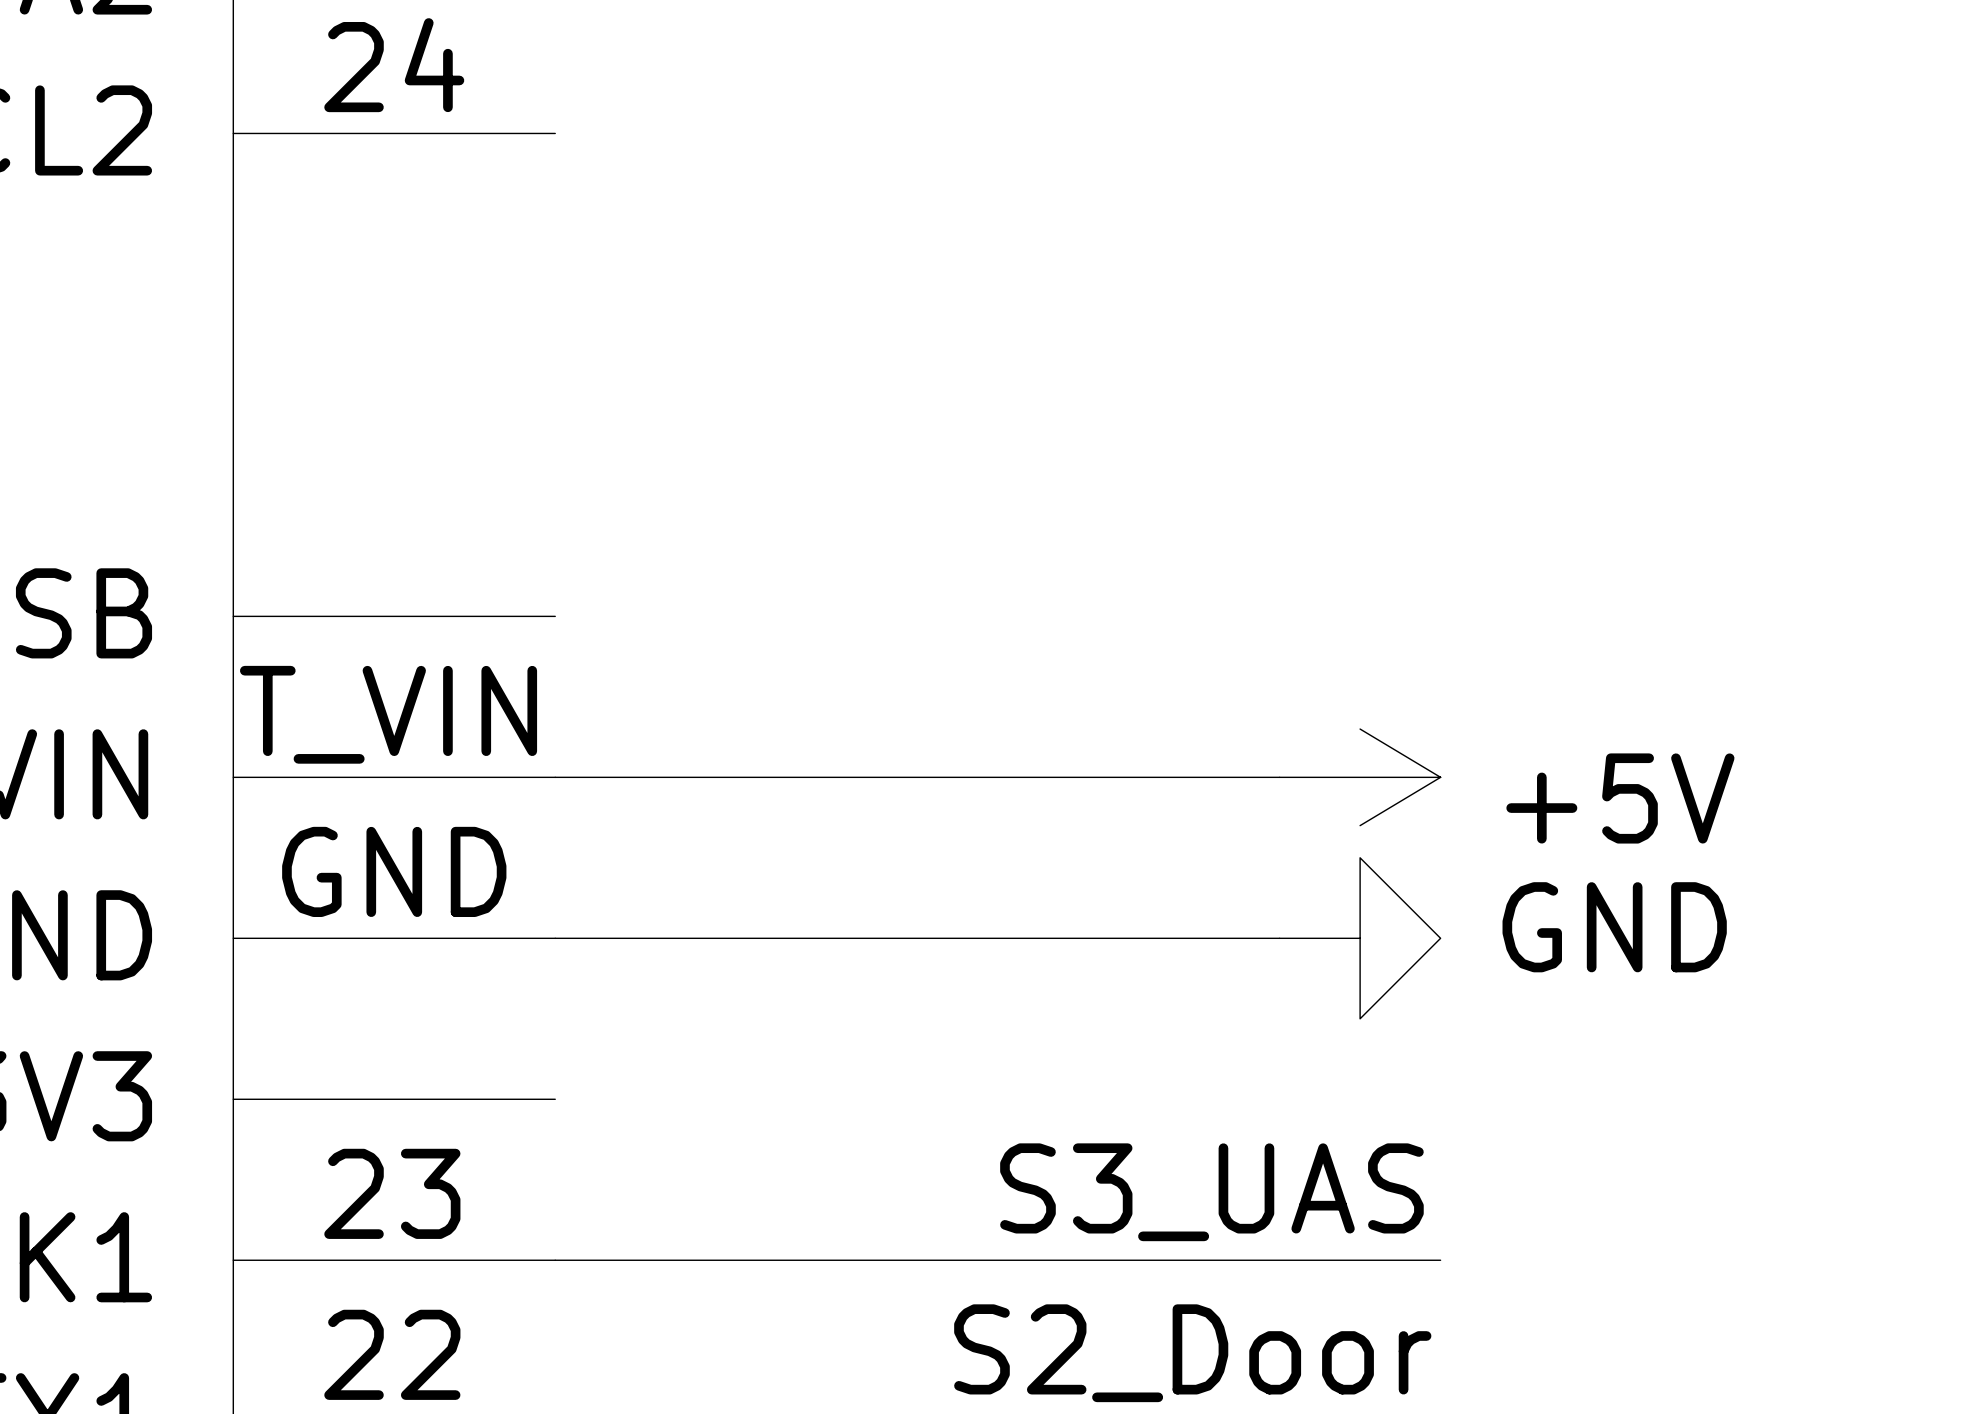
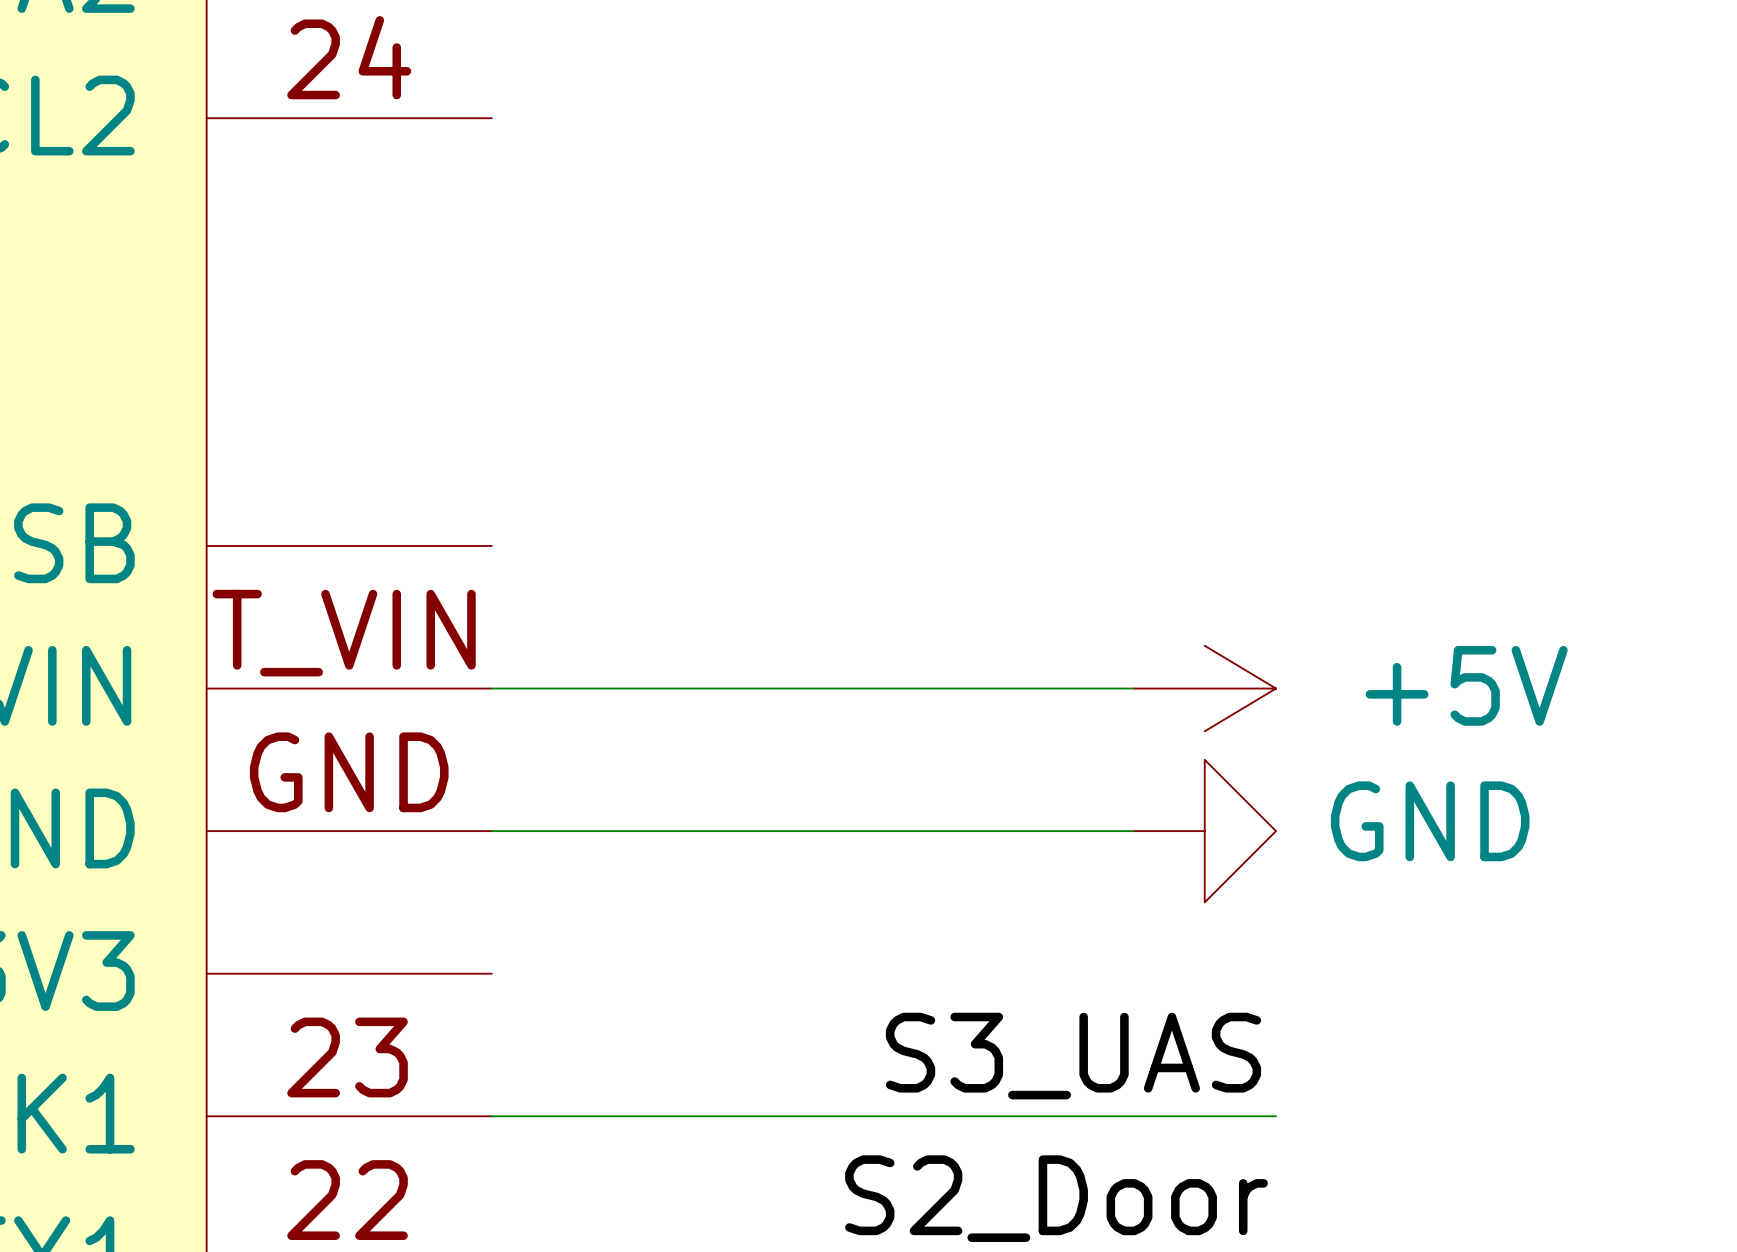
power symbol text position: +5V (1620, 798) -> +5V (1466, 685)

